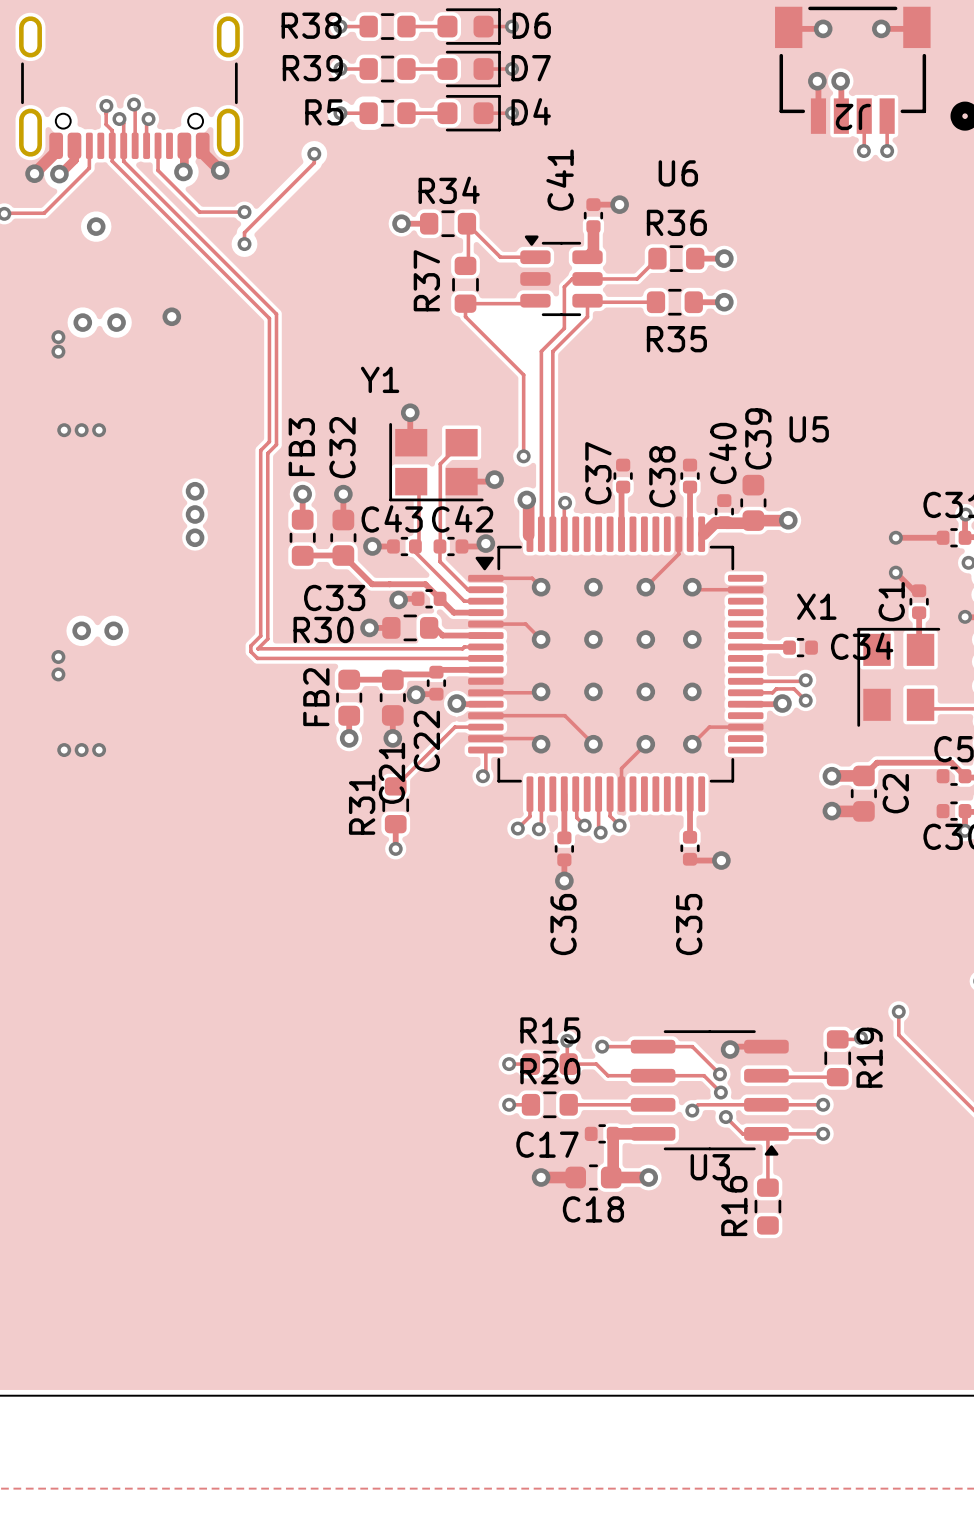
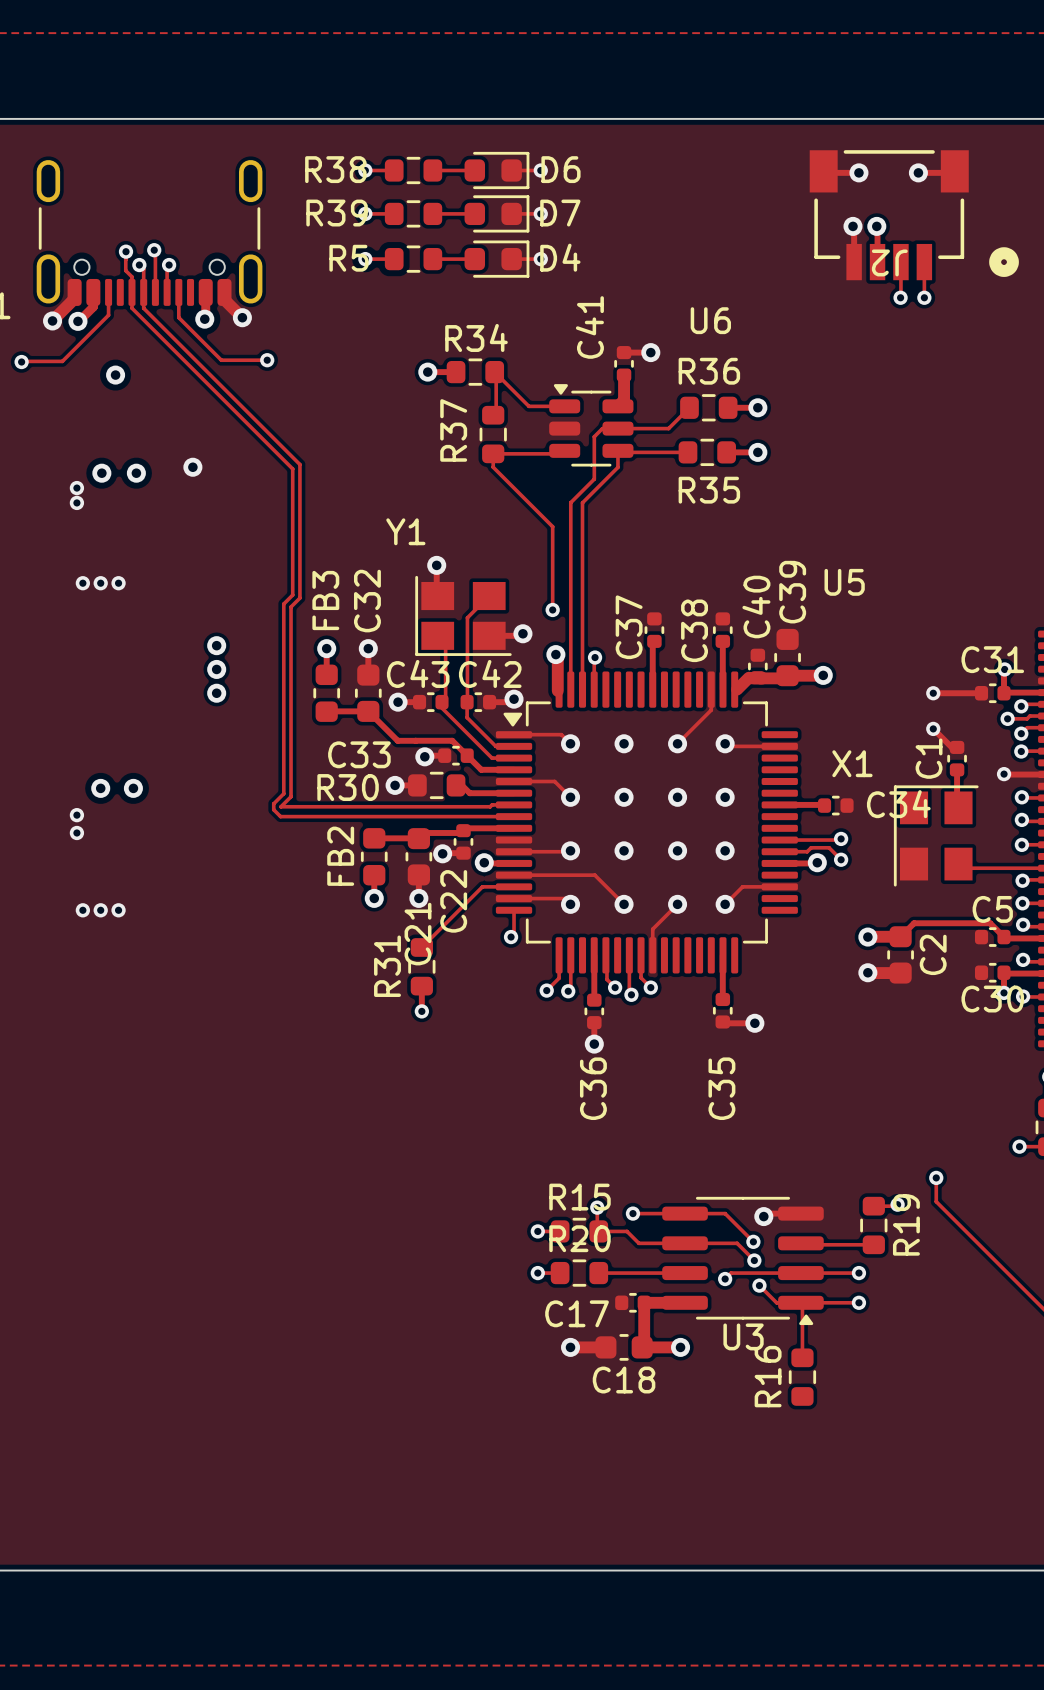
track: (314, 153) (314, 162) (244, 232) (244, 244) -> none
via: (314, 153) -> none
via: (244, 244) -> none

